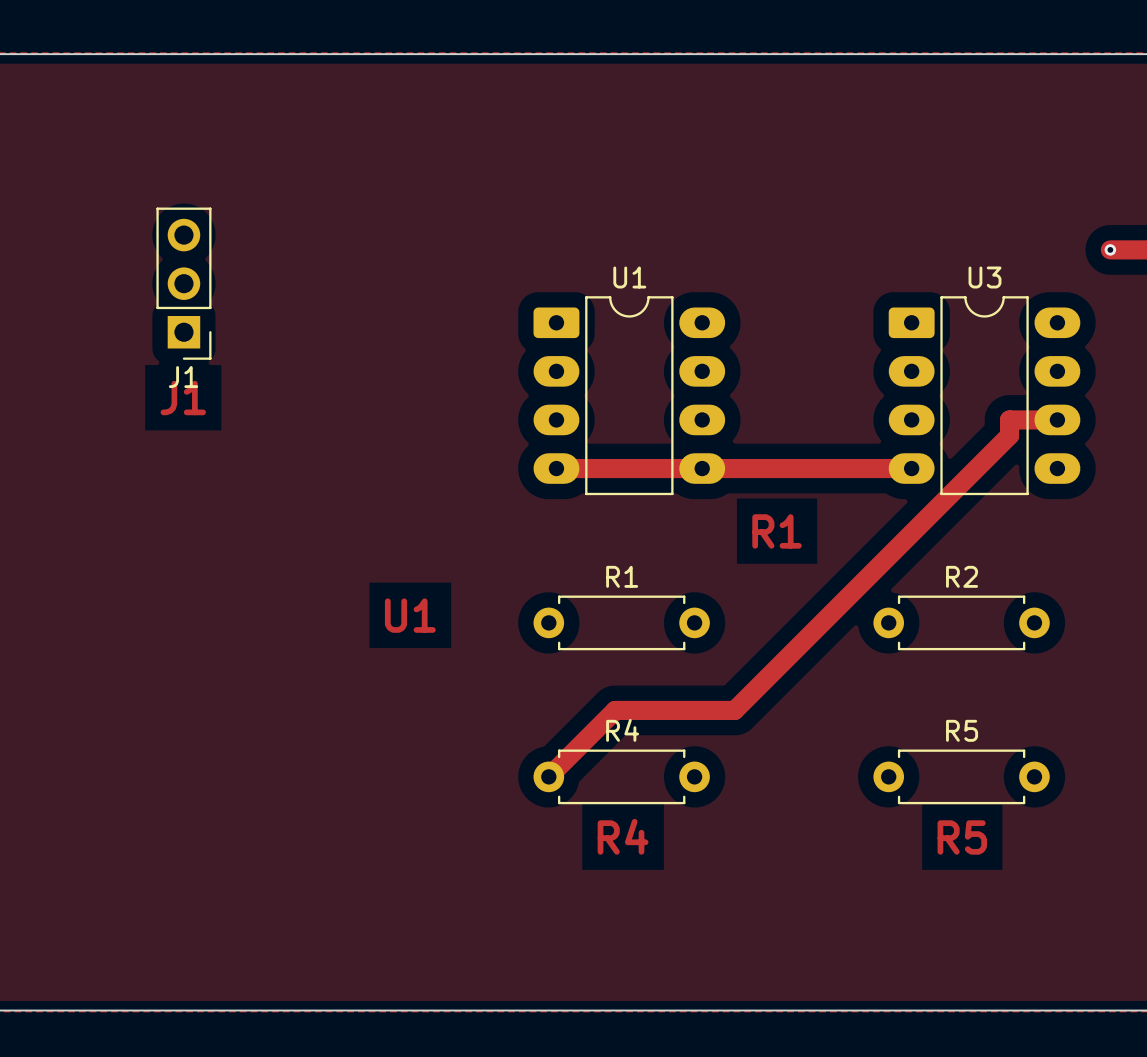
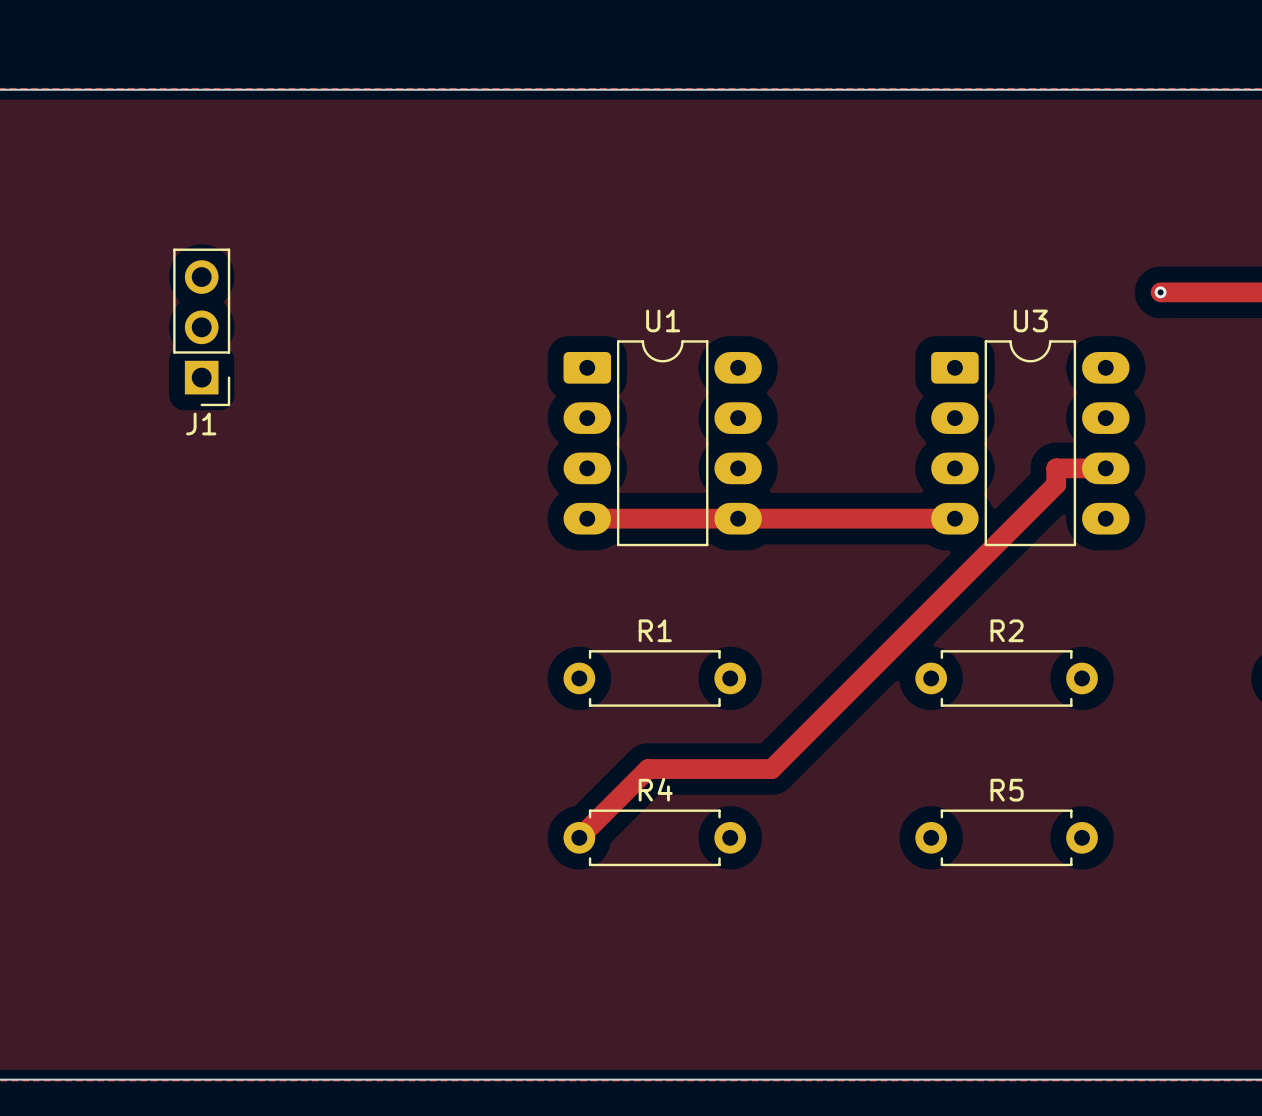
text: J1 (183, 398) -> none
text: R1 (777, 531) -> none
text: U1 (410, 615) -> none
text: R4 (623, 836) -> none
text: R5 (962, 837) -> none

